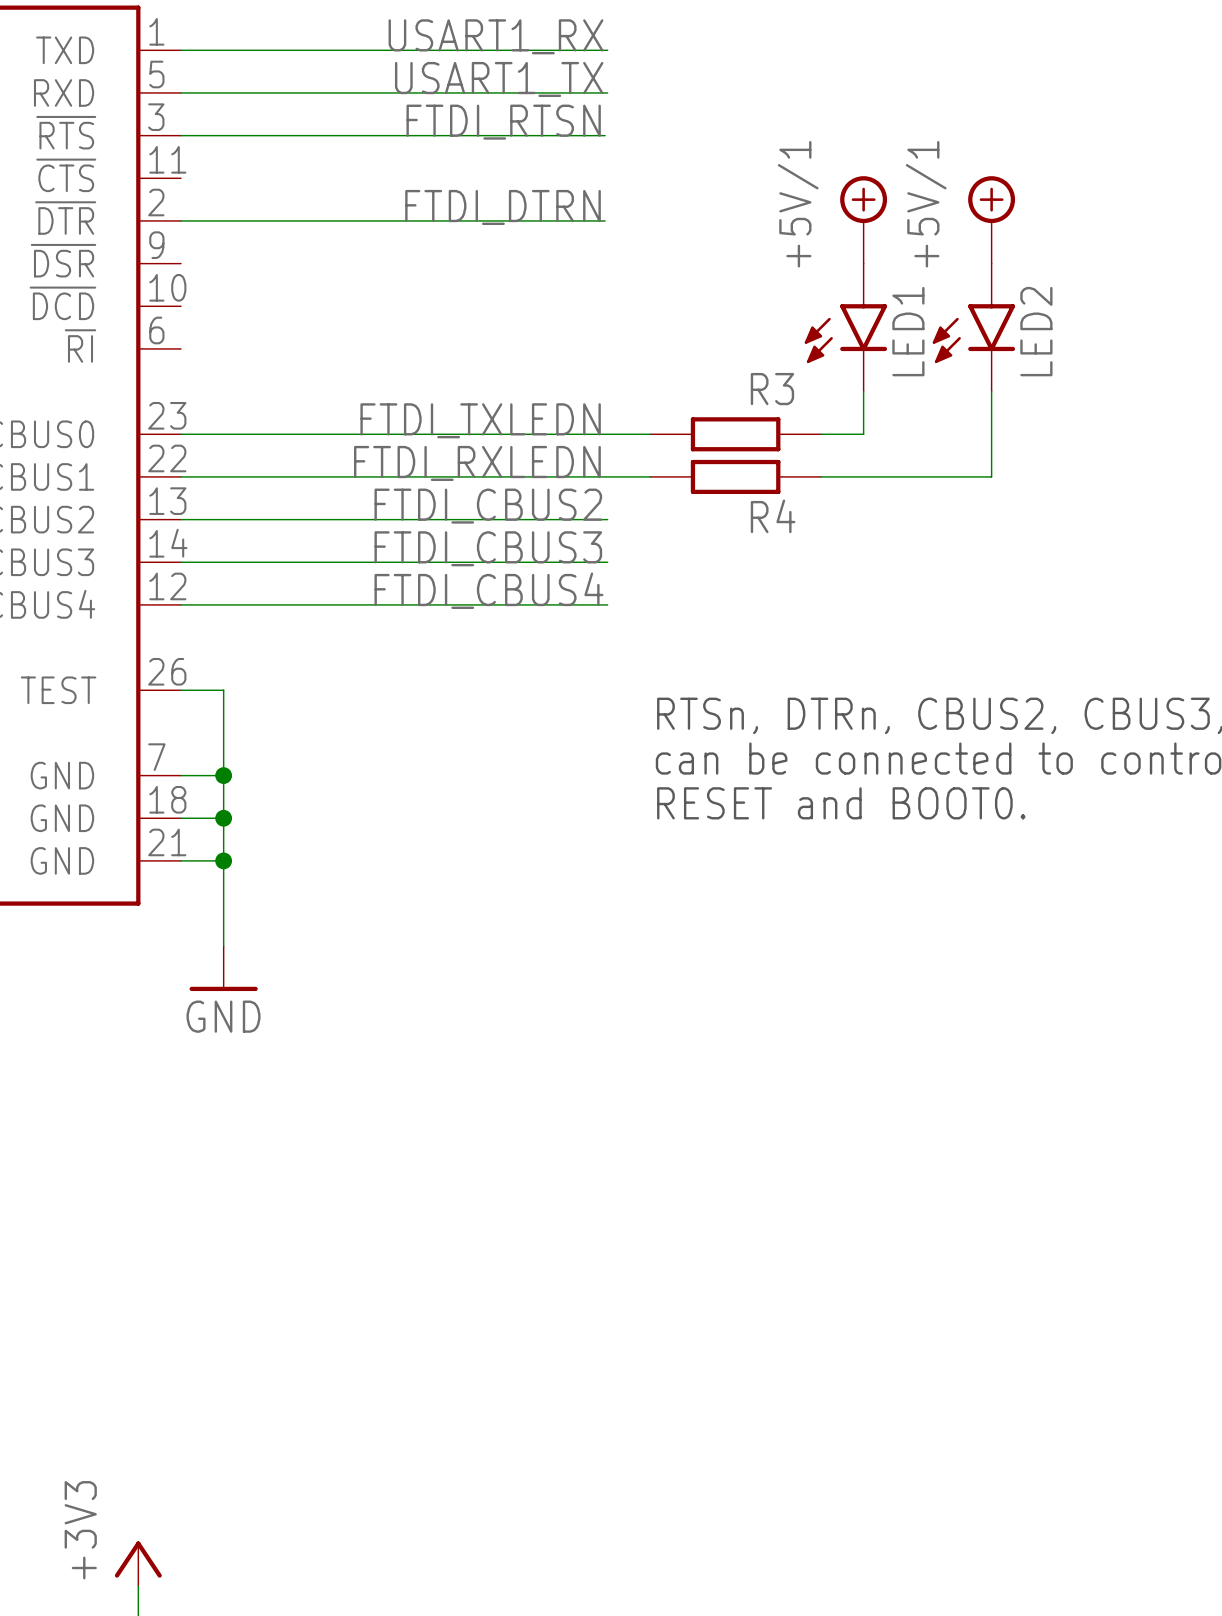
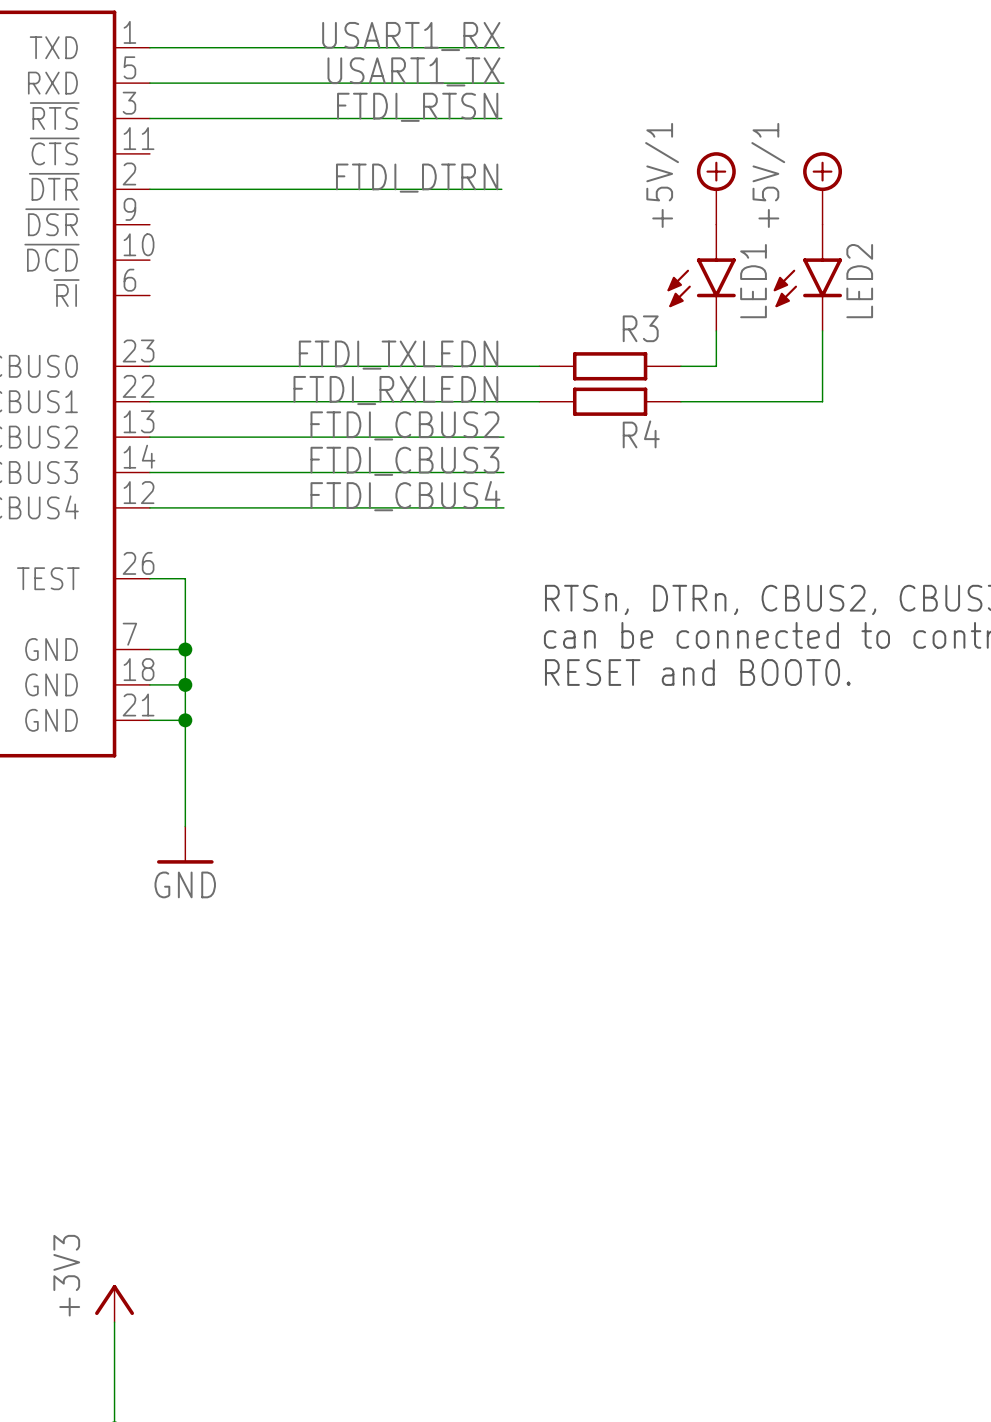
power symbol position: GND (223, 968) -> GND (185, 845)

